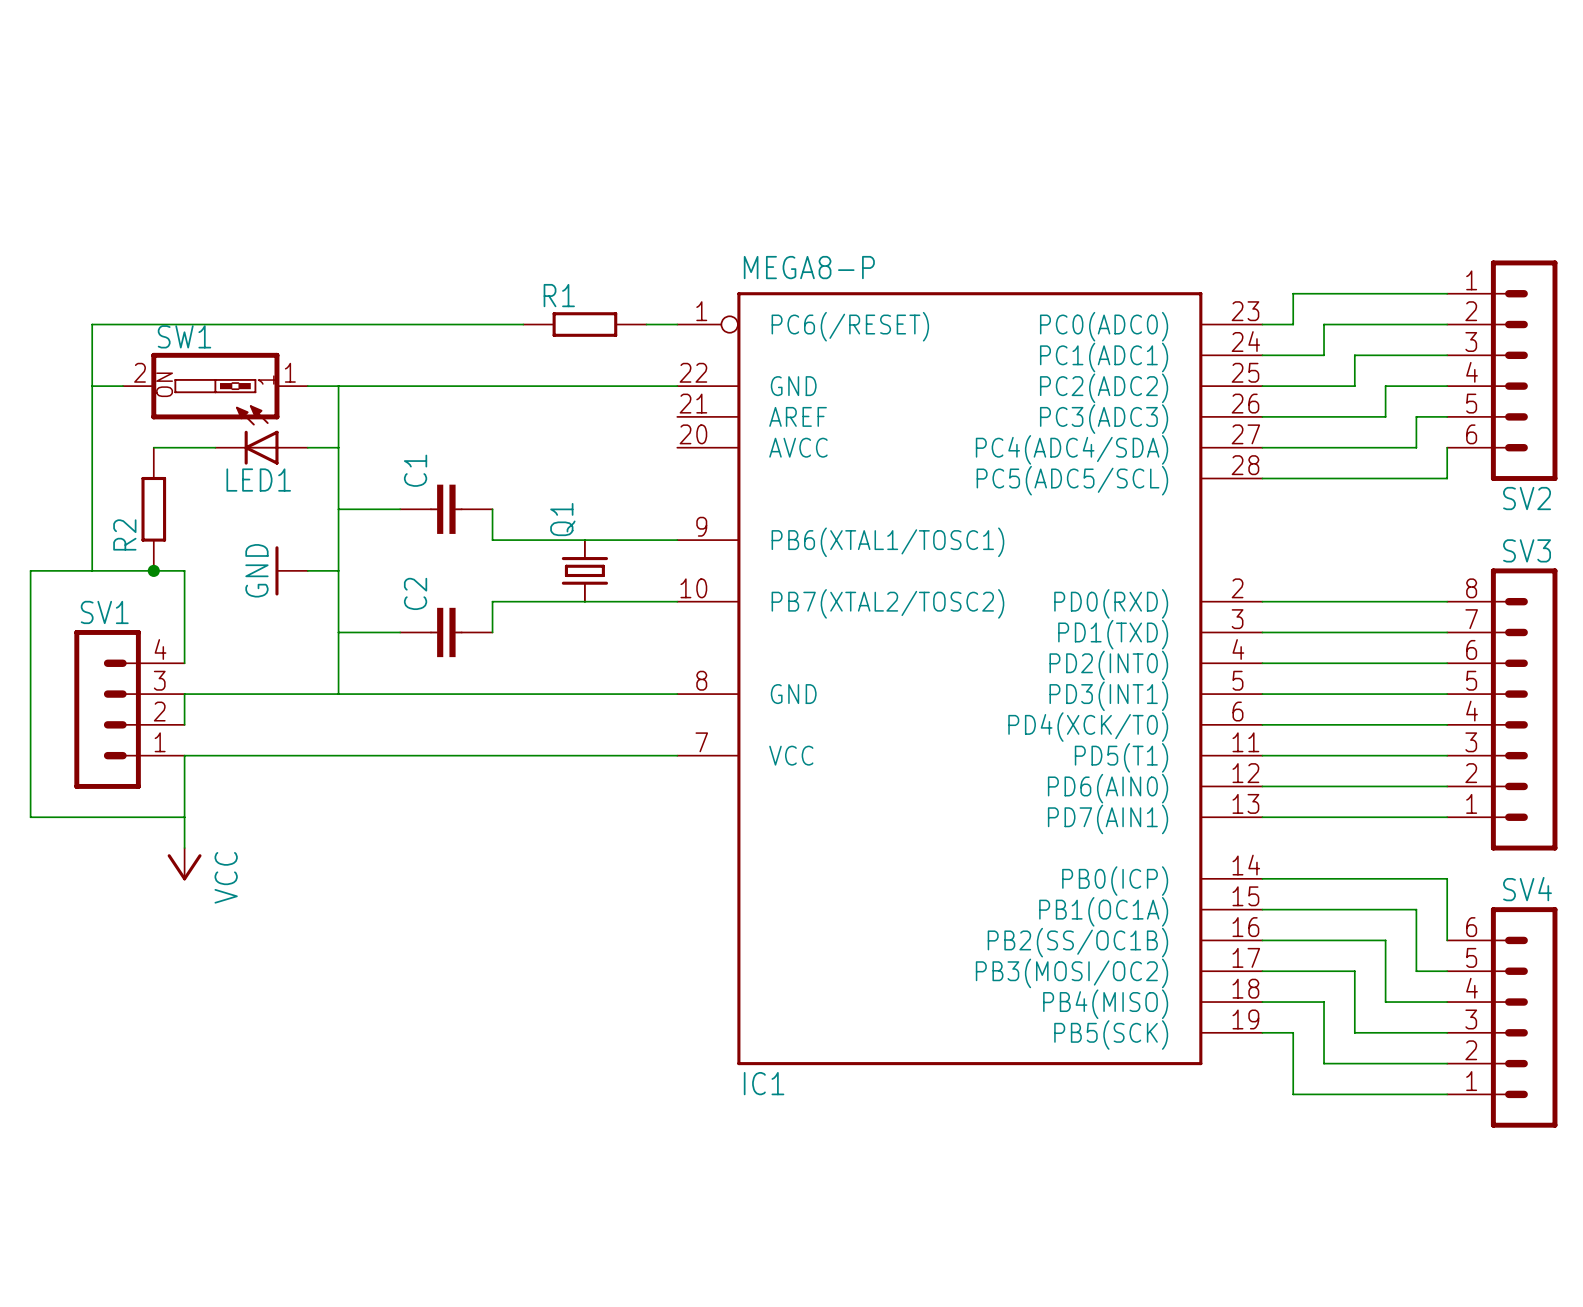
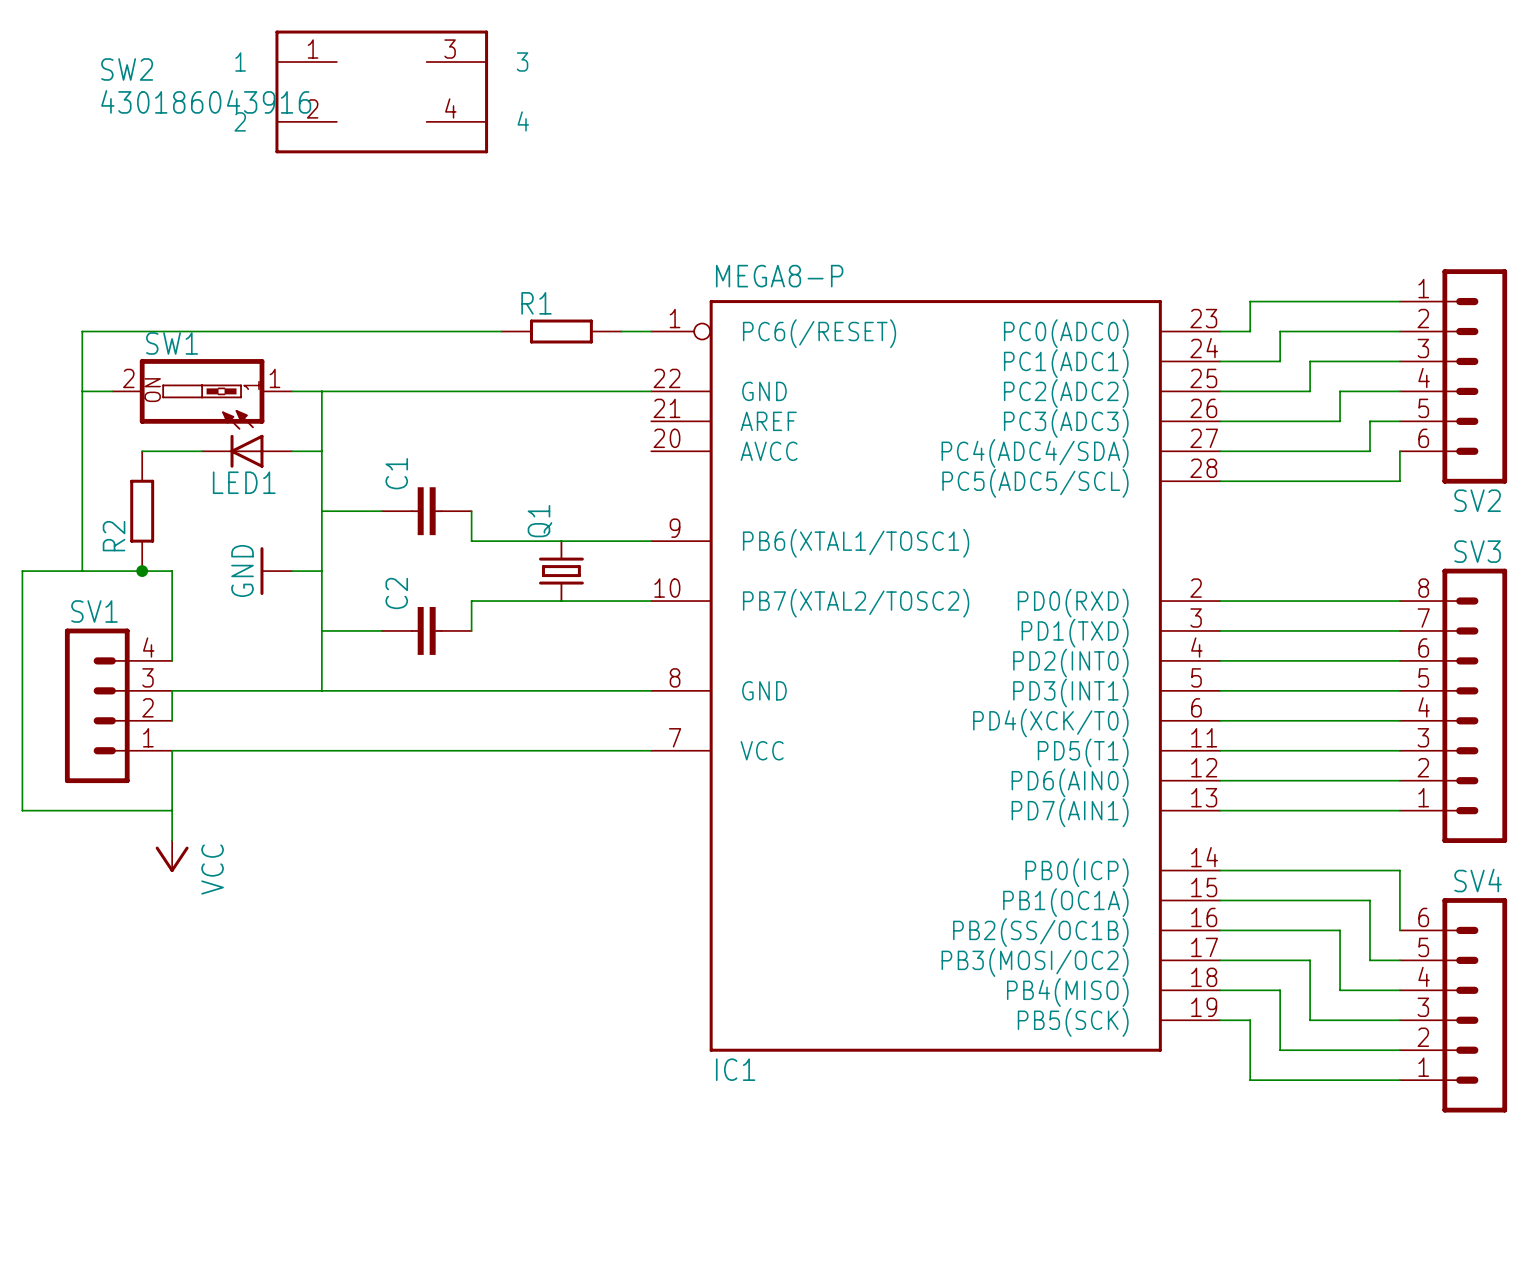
SW2: none -> 430186043916 (381, 91)

